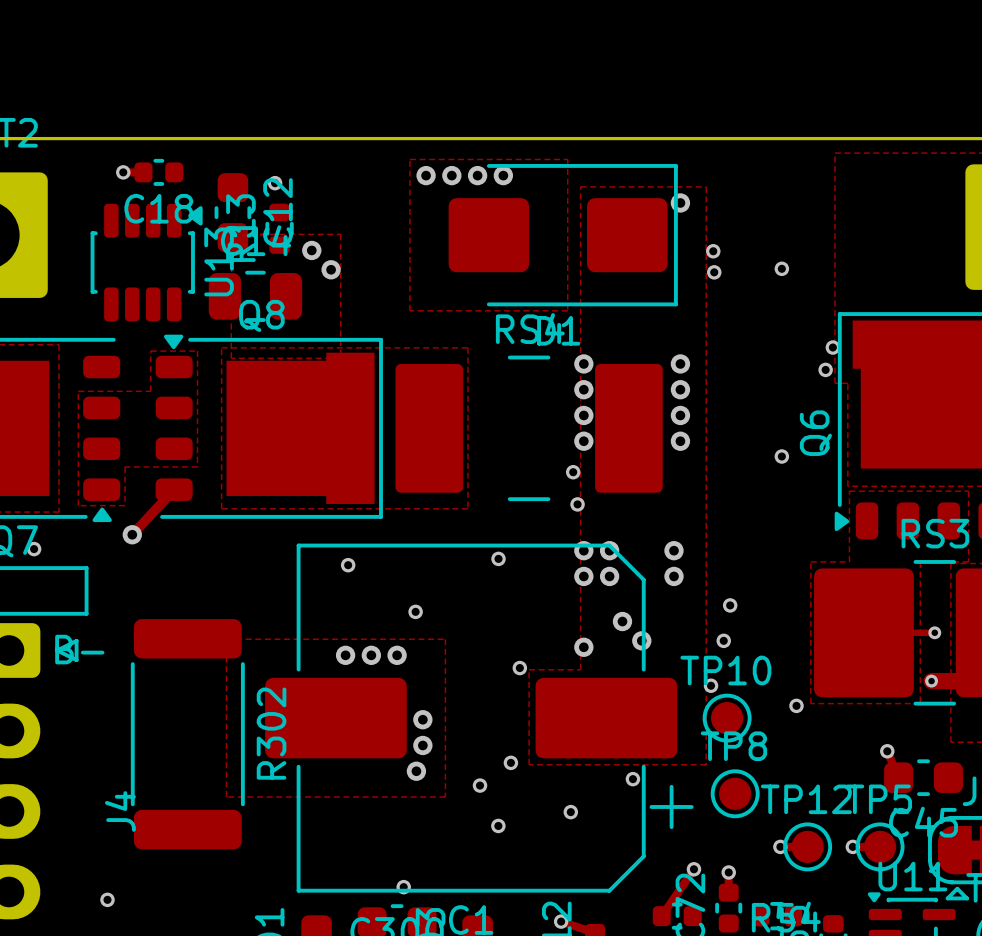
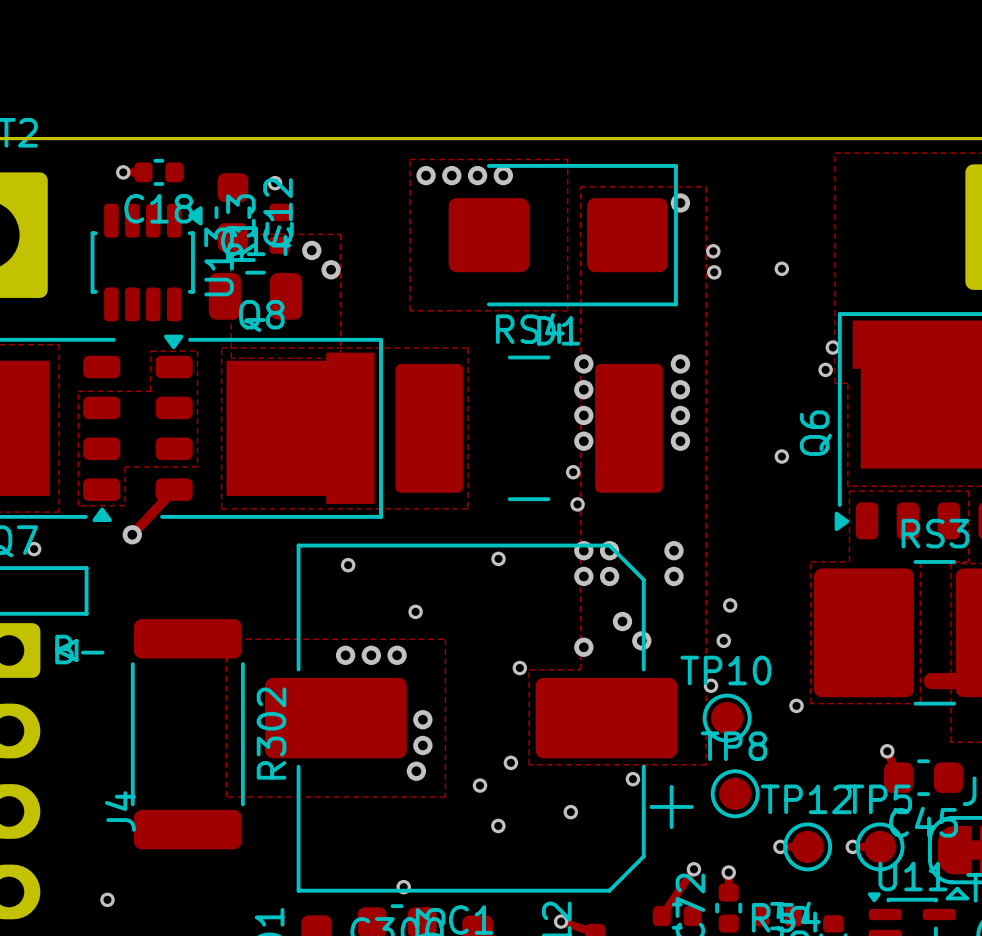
track: (910, 632) (934, 632) -> none
via: (934, 632) -> none
via: (931, 681) -> none

